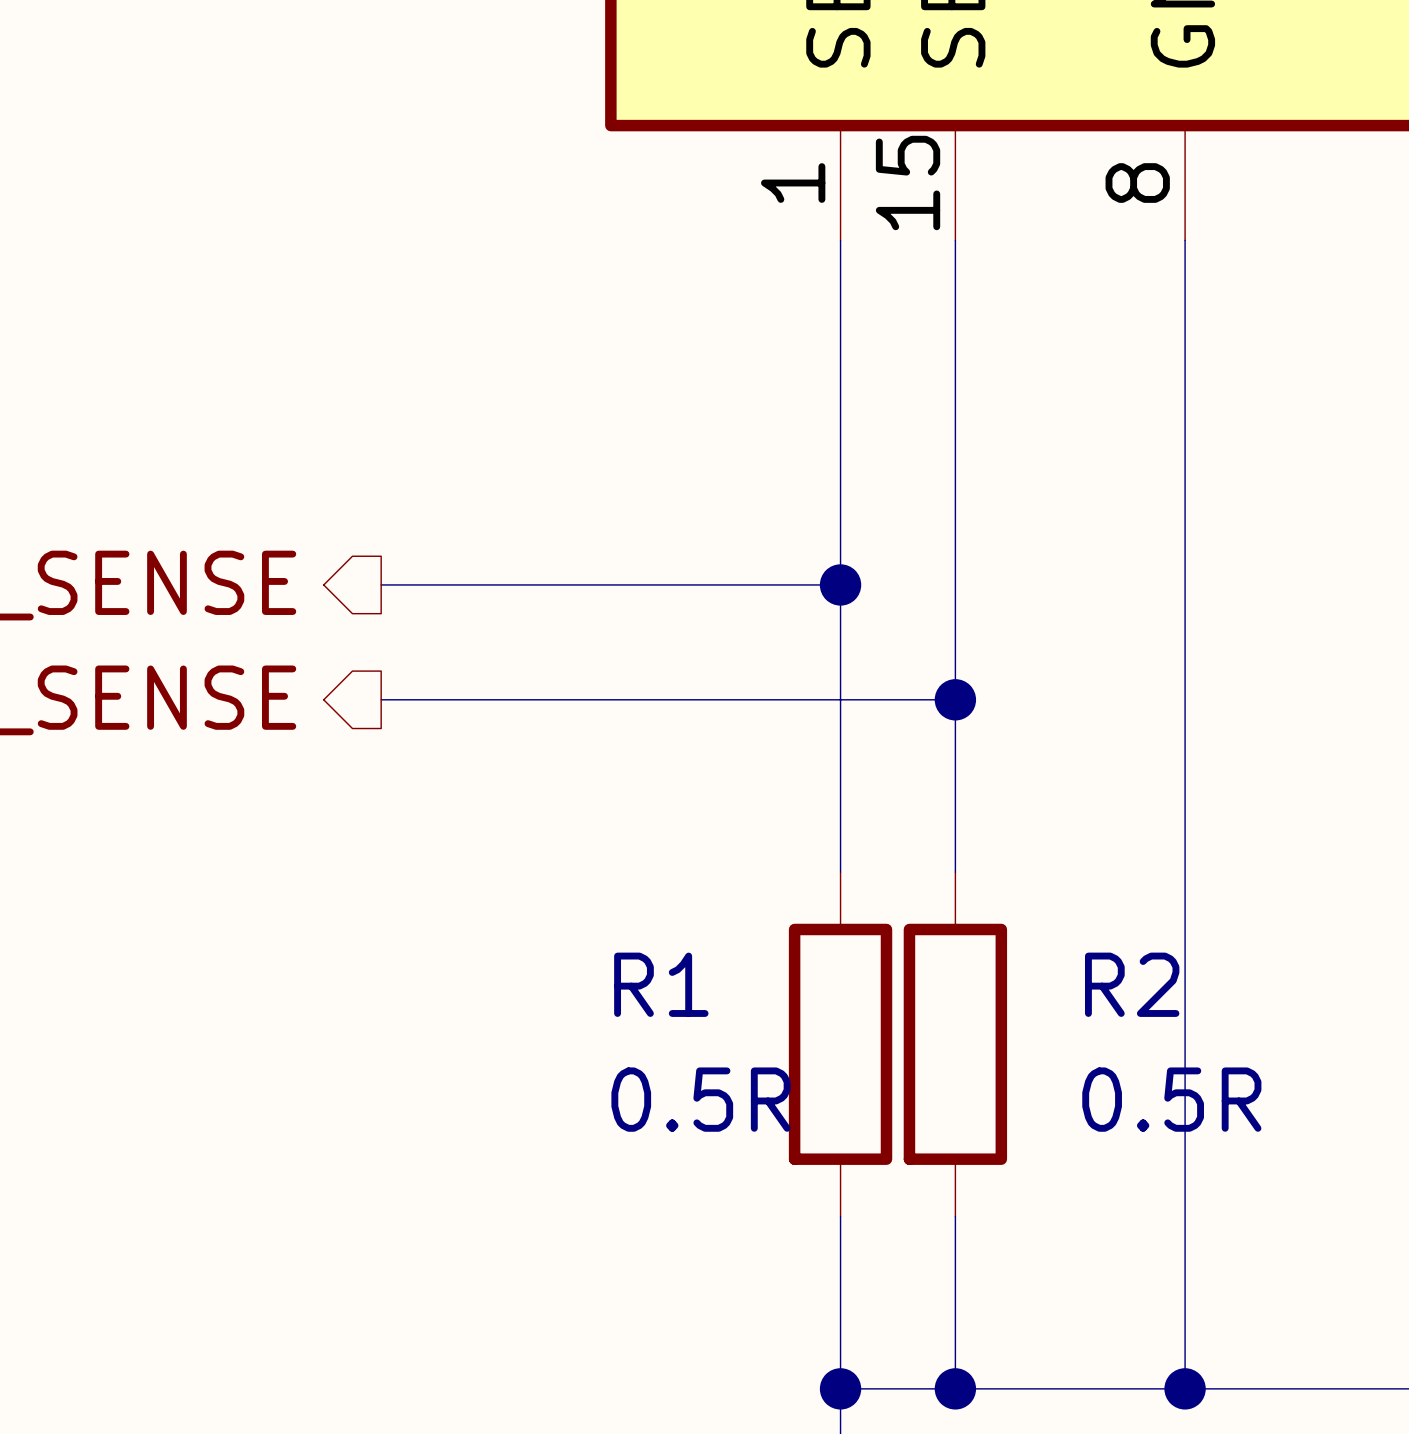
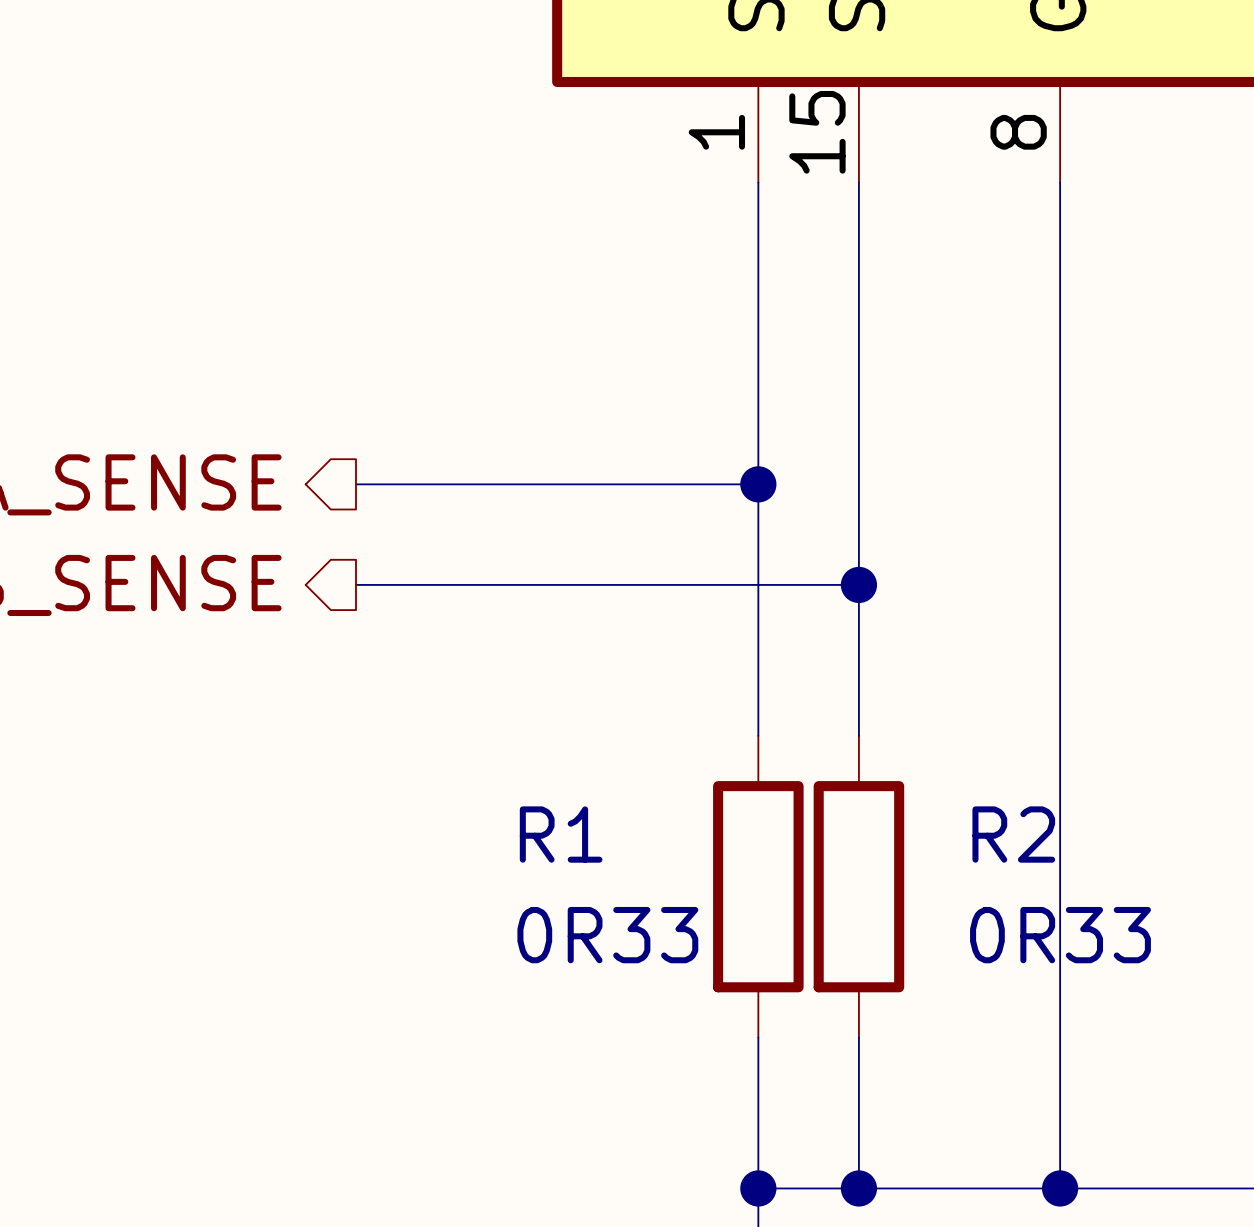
R1 name position: R1 (661, 984) -> R1 (561, 834)
R1 value: 0.5R (700, 1099) -> 0R33 (607, 935)
R2 value: 0.5R (1171, 1099) -> 0R33 (1060, 935)

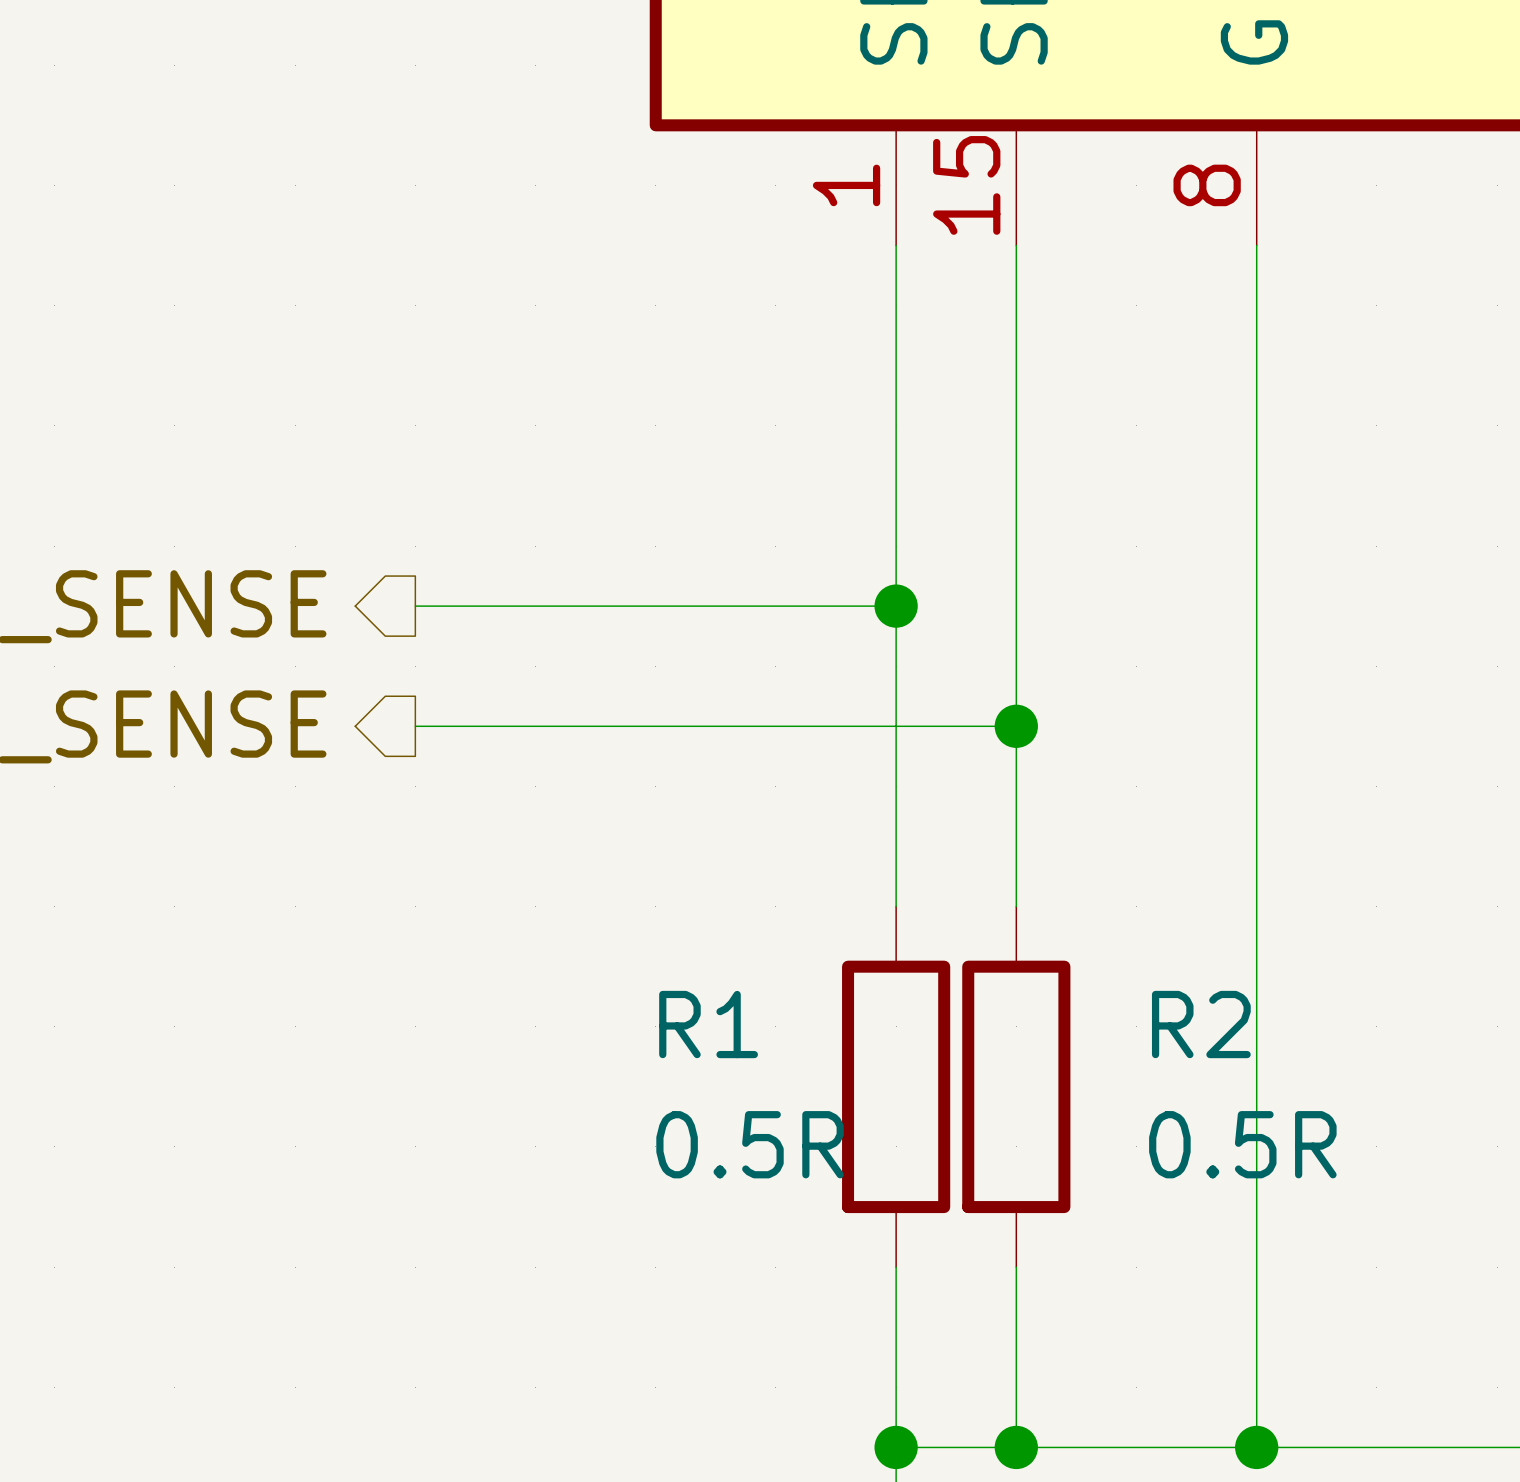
R1 name position: R1 (561, 834) -> R1 (708, 1024)
R1 value: 0R33 (607, 935) -> 0.5R (750, 1144)
R2 value: 0R33 (1060, 935) -> 0.5R (1242, 1144)

